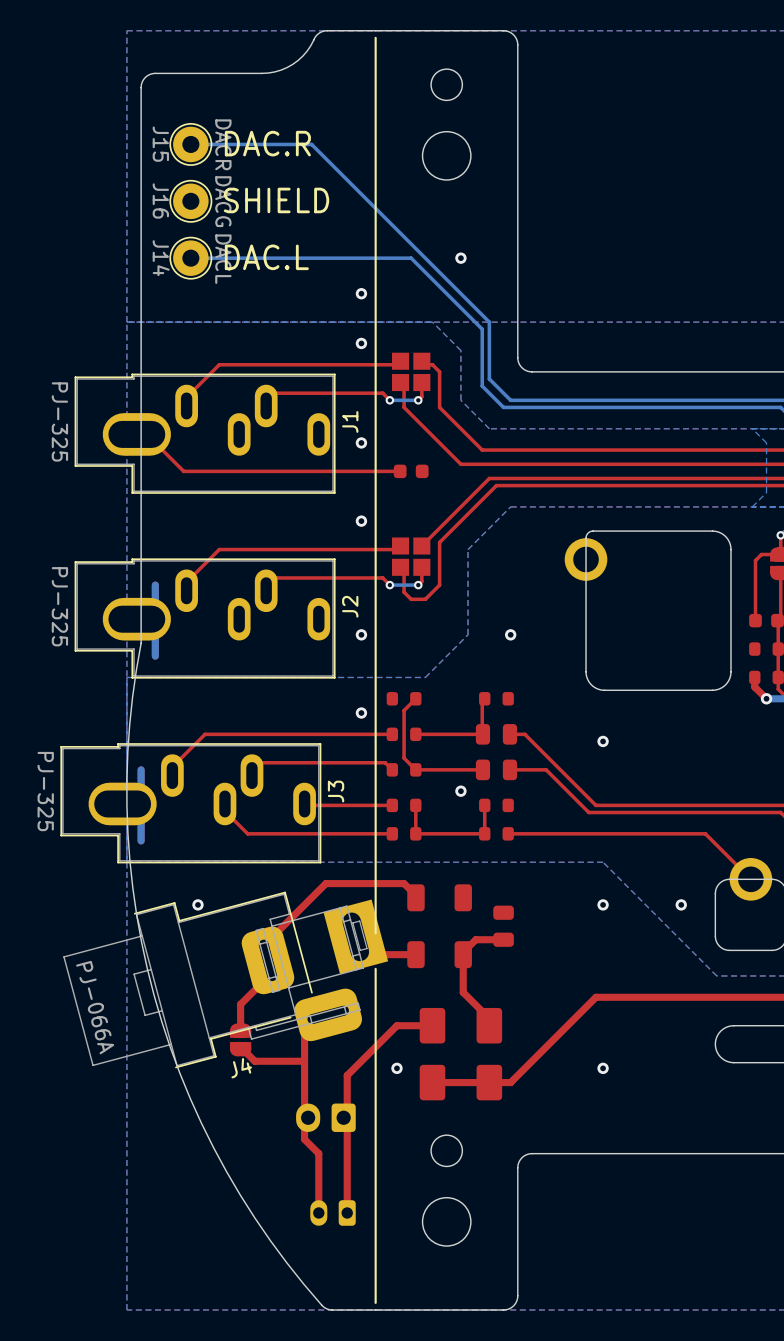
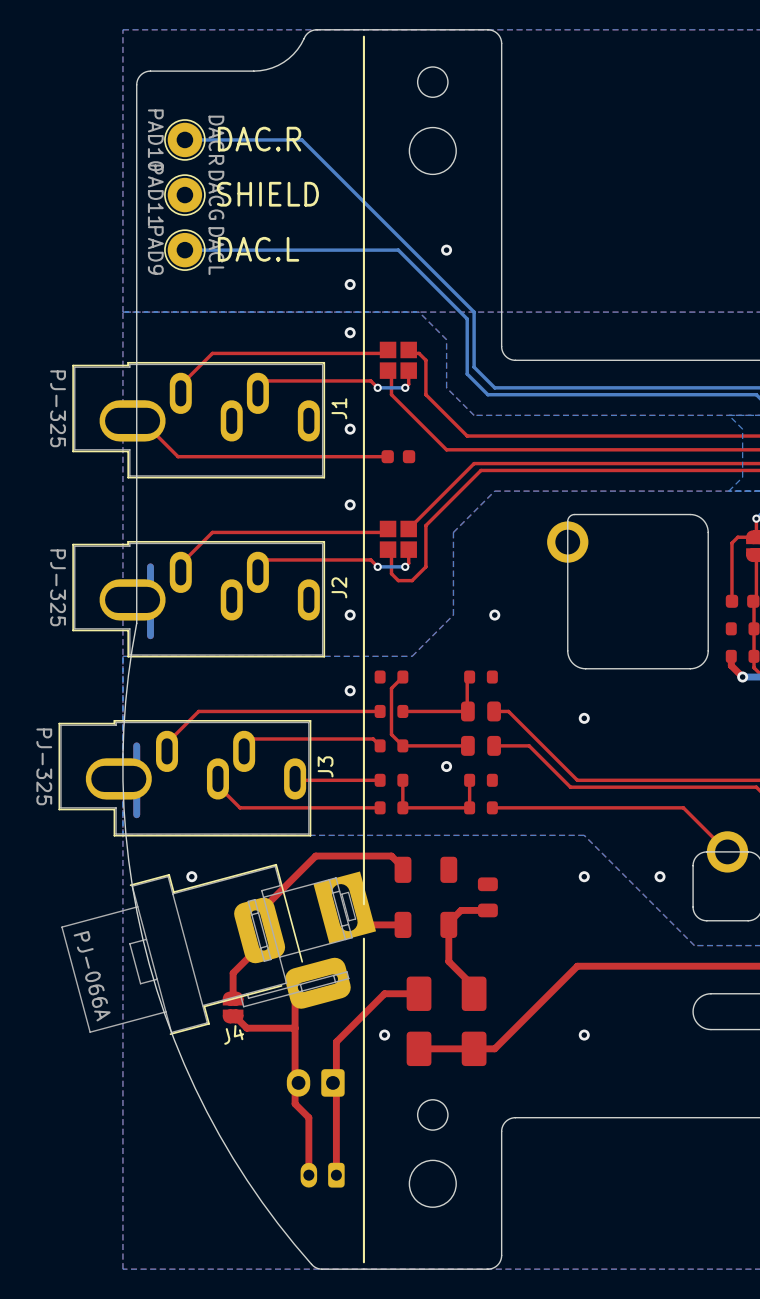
J15 name: J15 (160, 144) -> PAD10 (155, 140)
J16 name: J16 (160, 200) -> PAD11 (155, 195)
J14 name: J14 (161, 258) -> PAD9 (155, 250)

